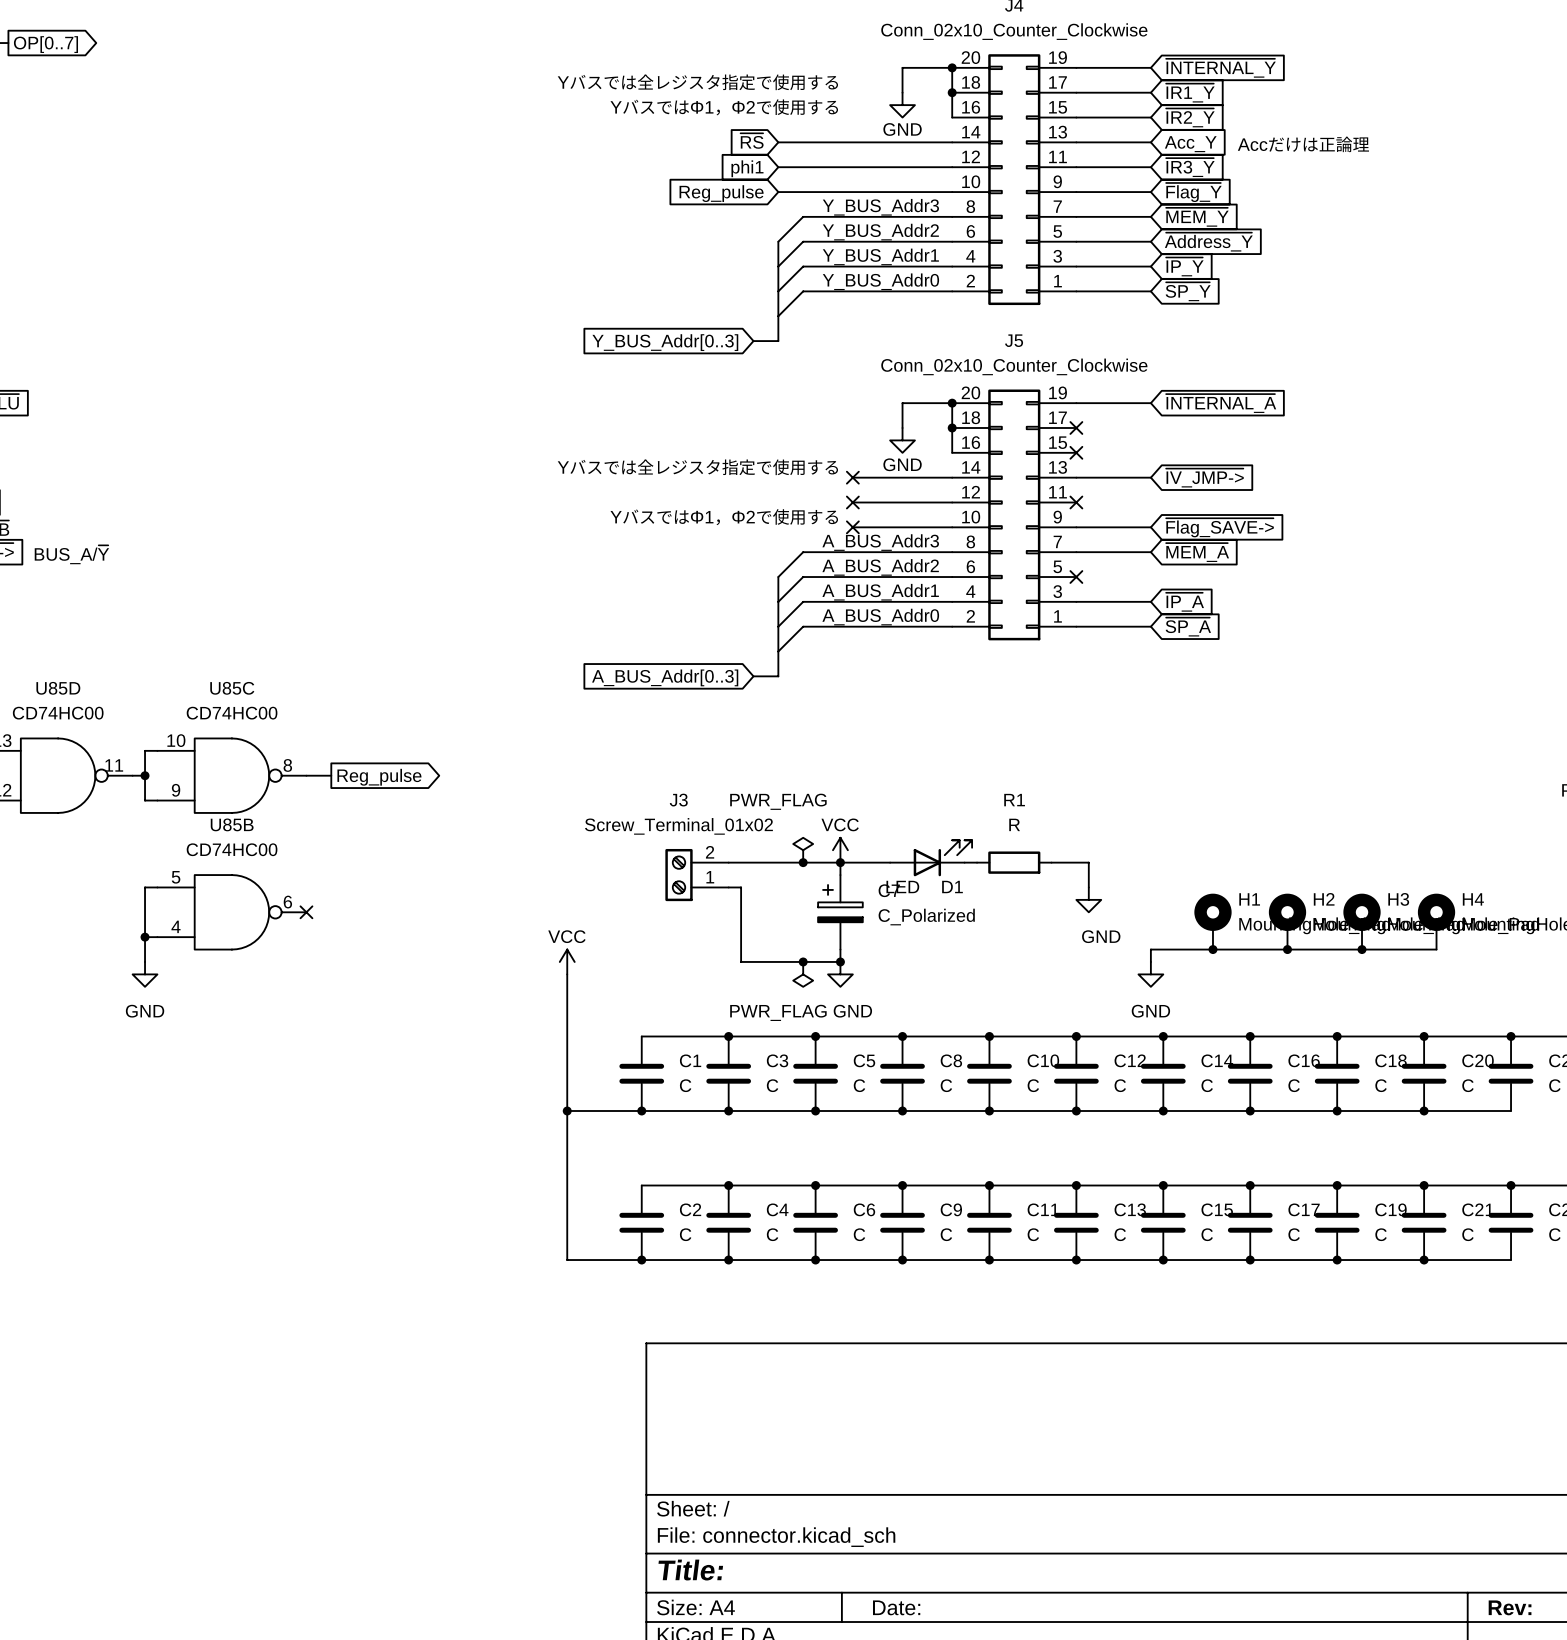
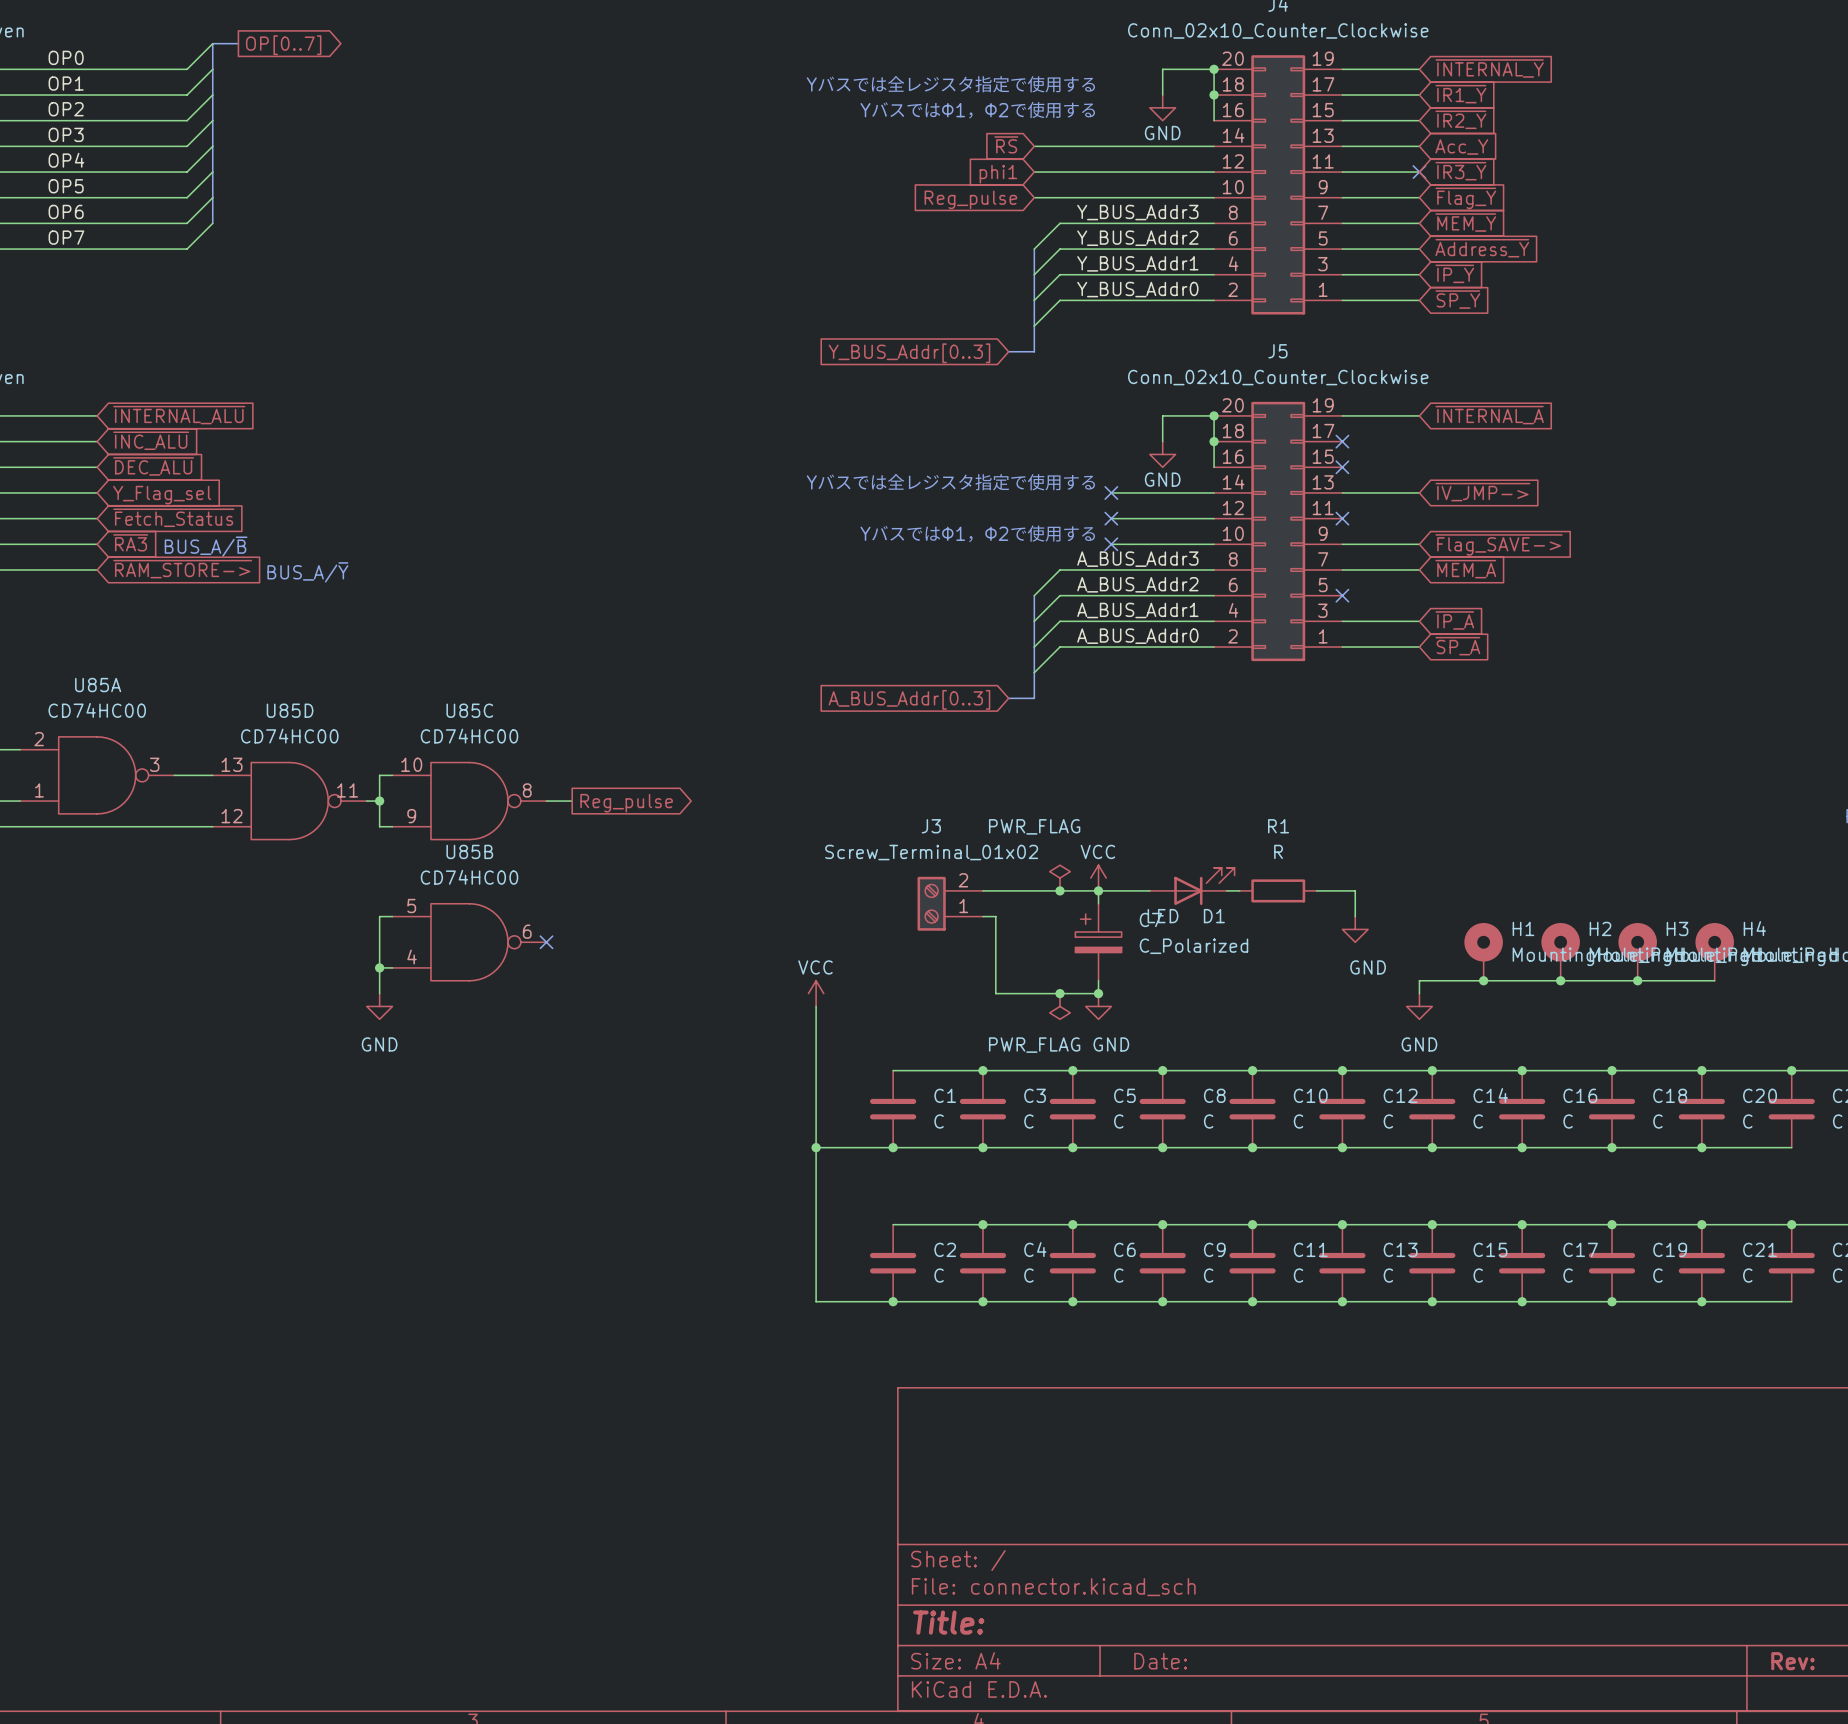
text: Accだけは正論理 (1303, 144) -> none
no-connect mark: none -> (1419, 172)

